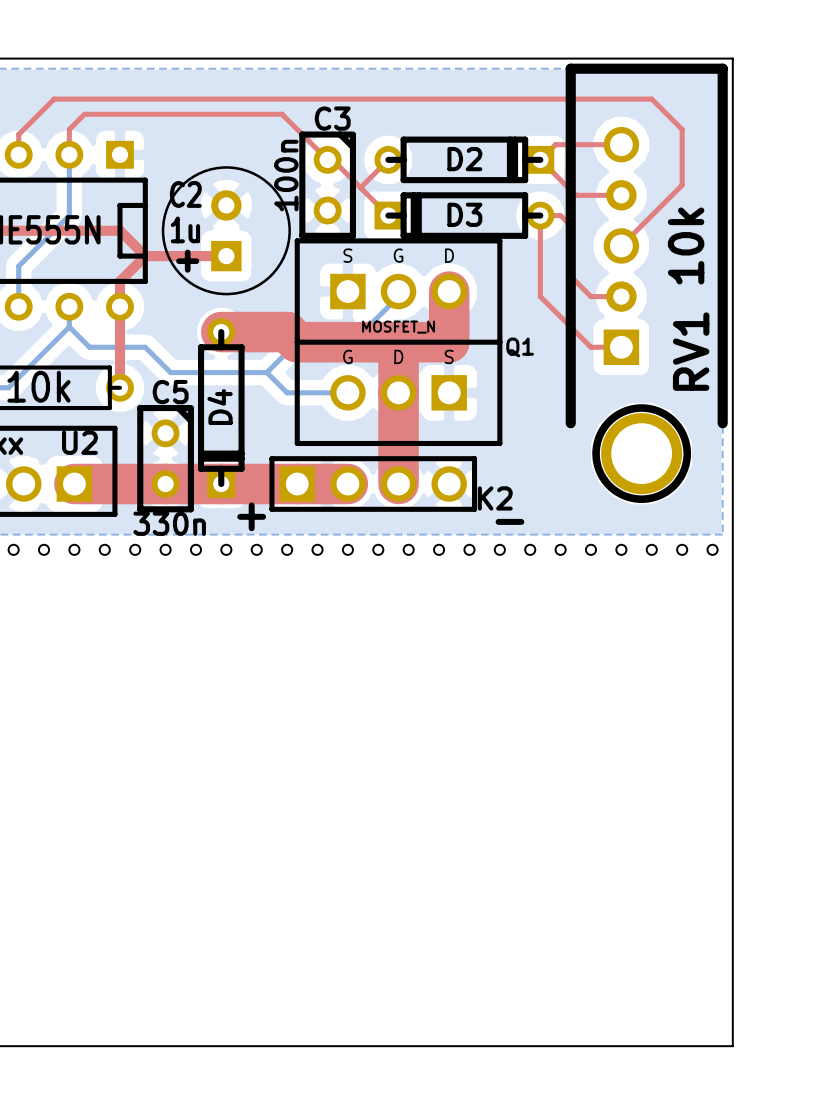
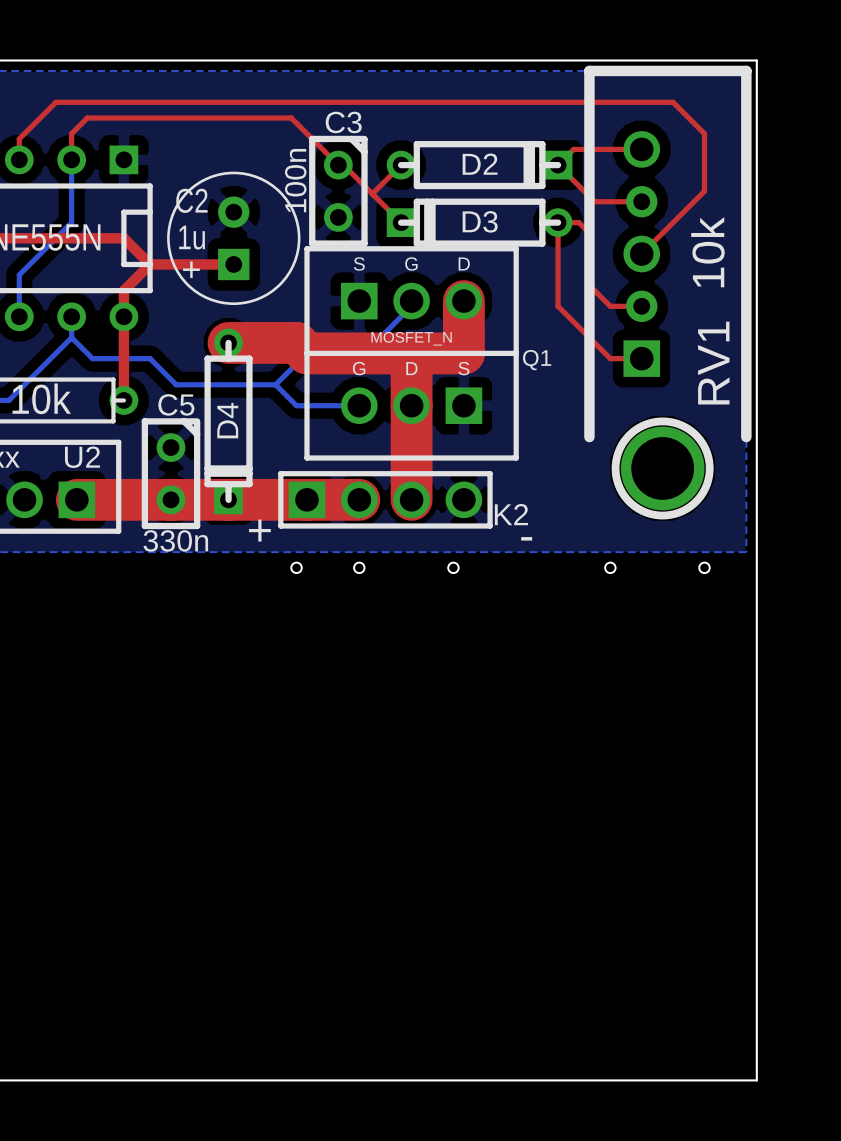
part: (13, 549) -> none
part: (44, 549) -> none
part: (74, 549) -> none
part: (104, 549) -> none
part: (135, 549) -> none
part: (165, 549) -> none
part: (195, 549) -> none
part: (226, 549) -> none
part: (256, 549) -> none
part: (317, 549) -> none
part: (378, 549) -> none
part: (408, 549) -> none
part: (469, 549) -> none
part: (499, 549) -> none
part: (530, 549) -> none
part: (560, 549) -> none
part: (621, 549) -> none
part: (651, 549) -> none
part: (712, 549) -> none

